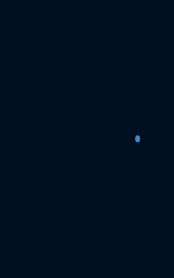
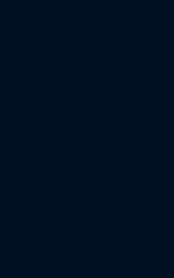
bottom track: (137, 137) (137, 140) -> none

